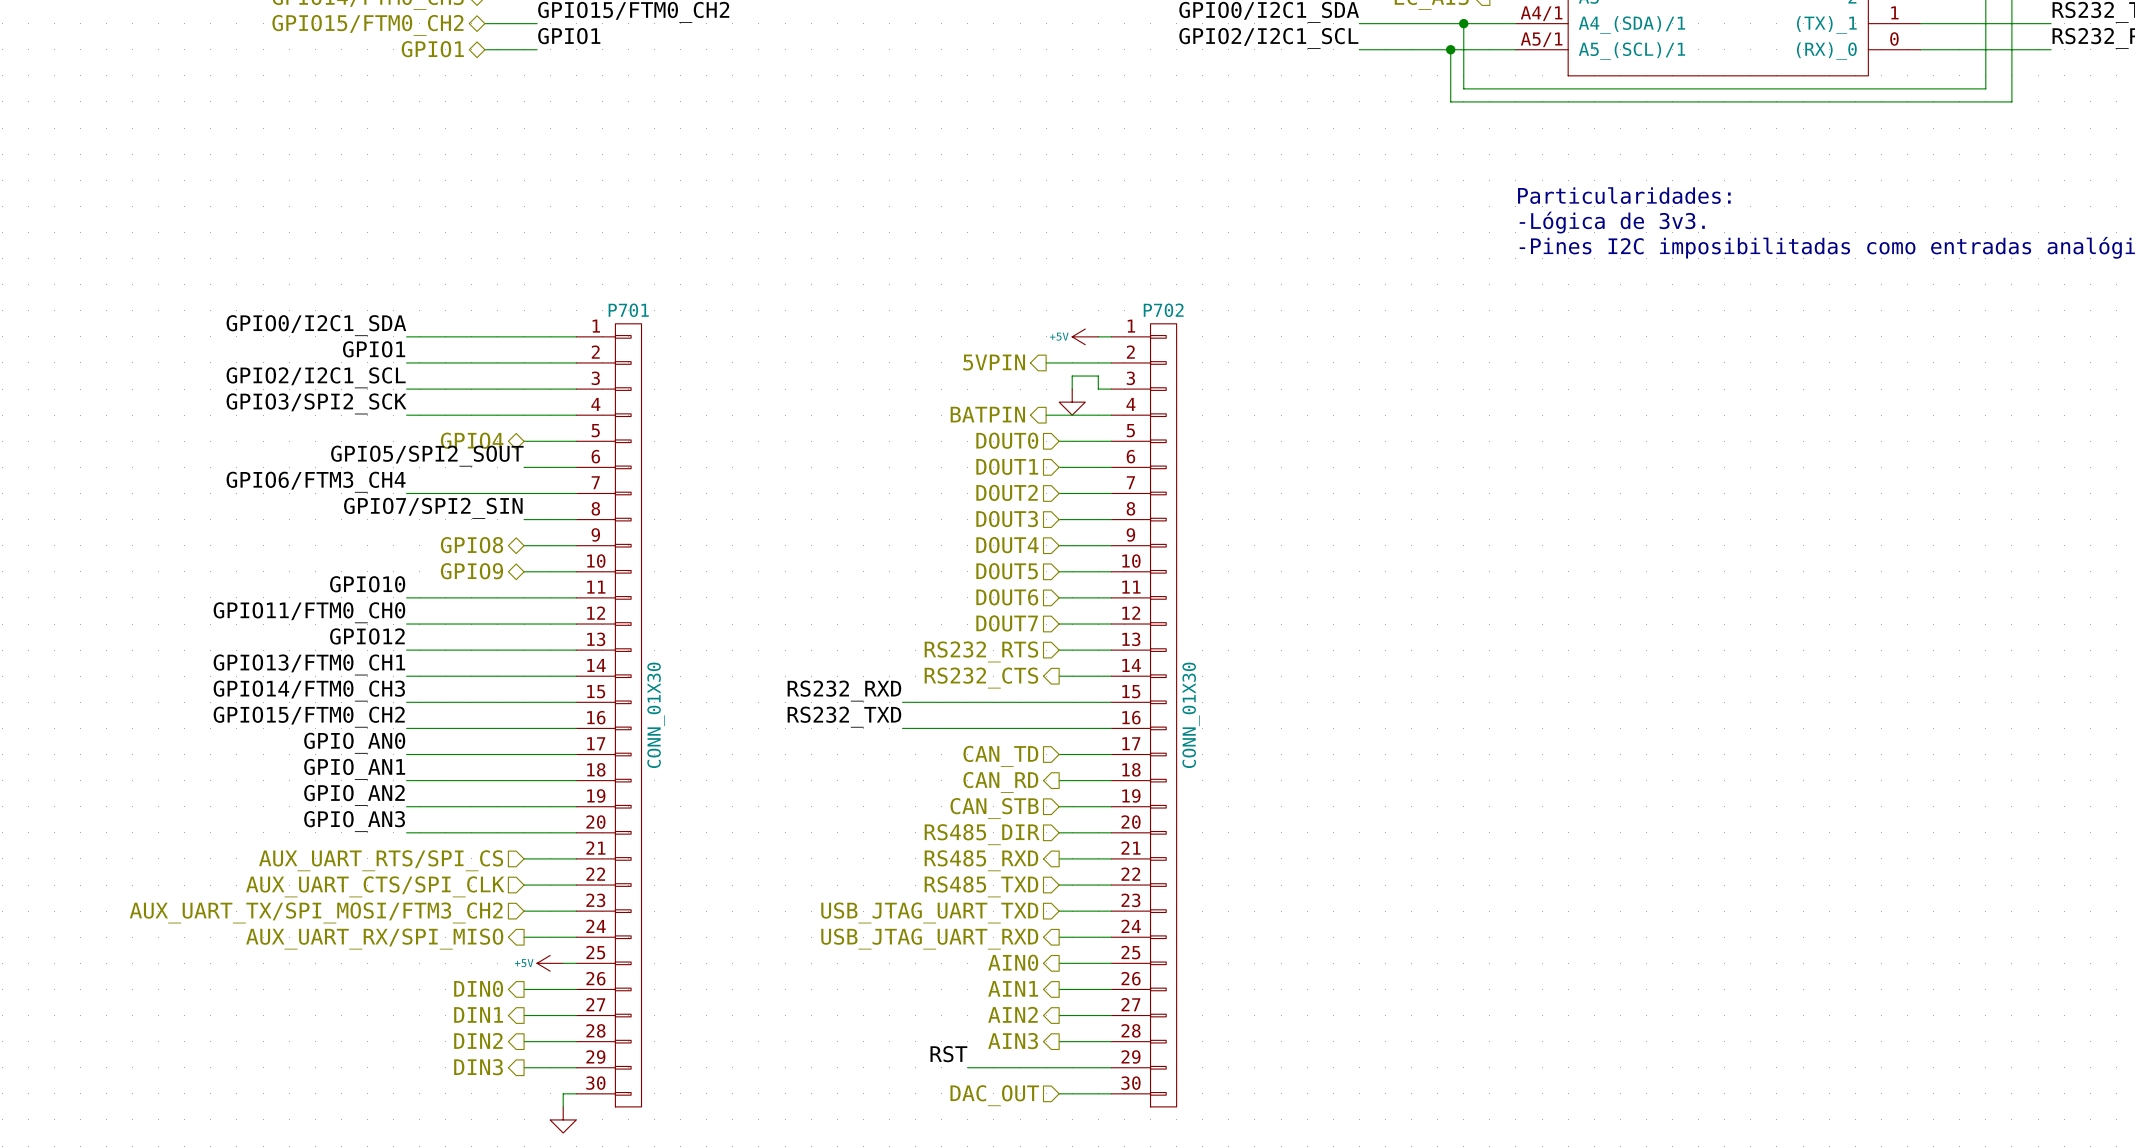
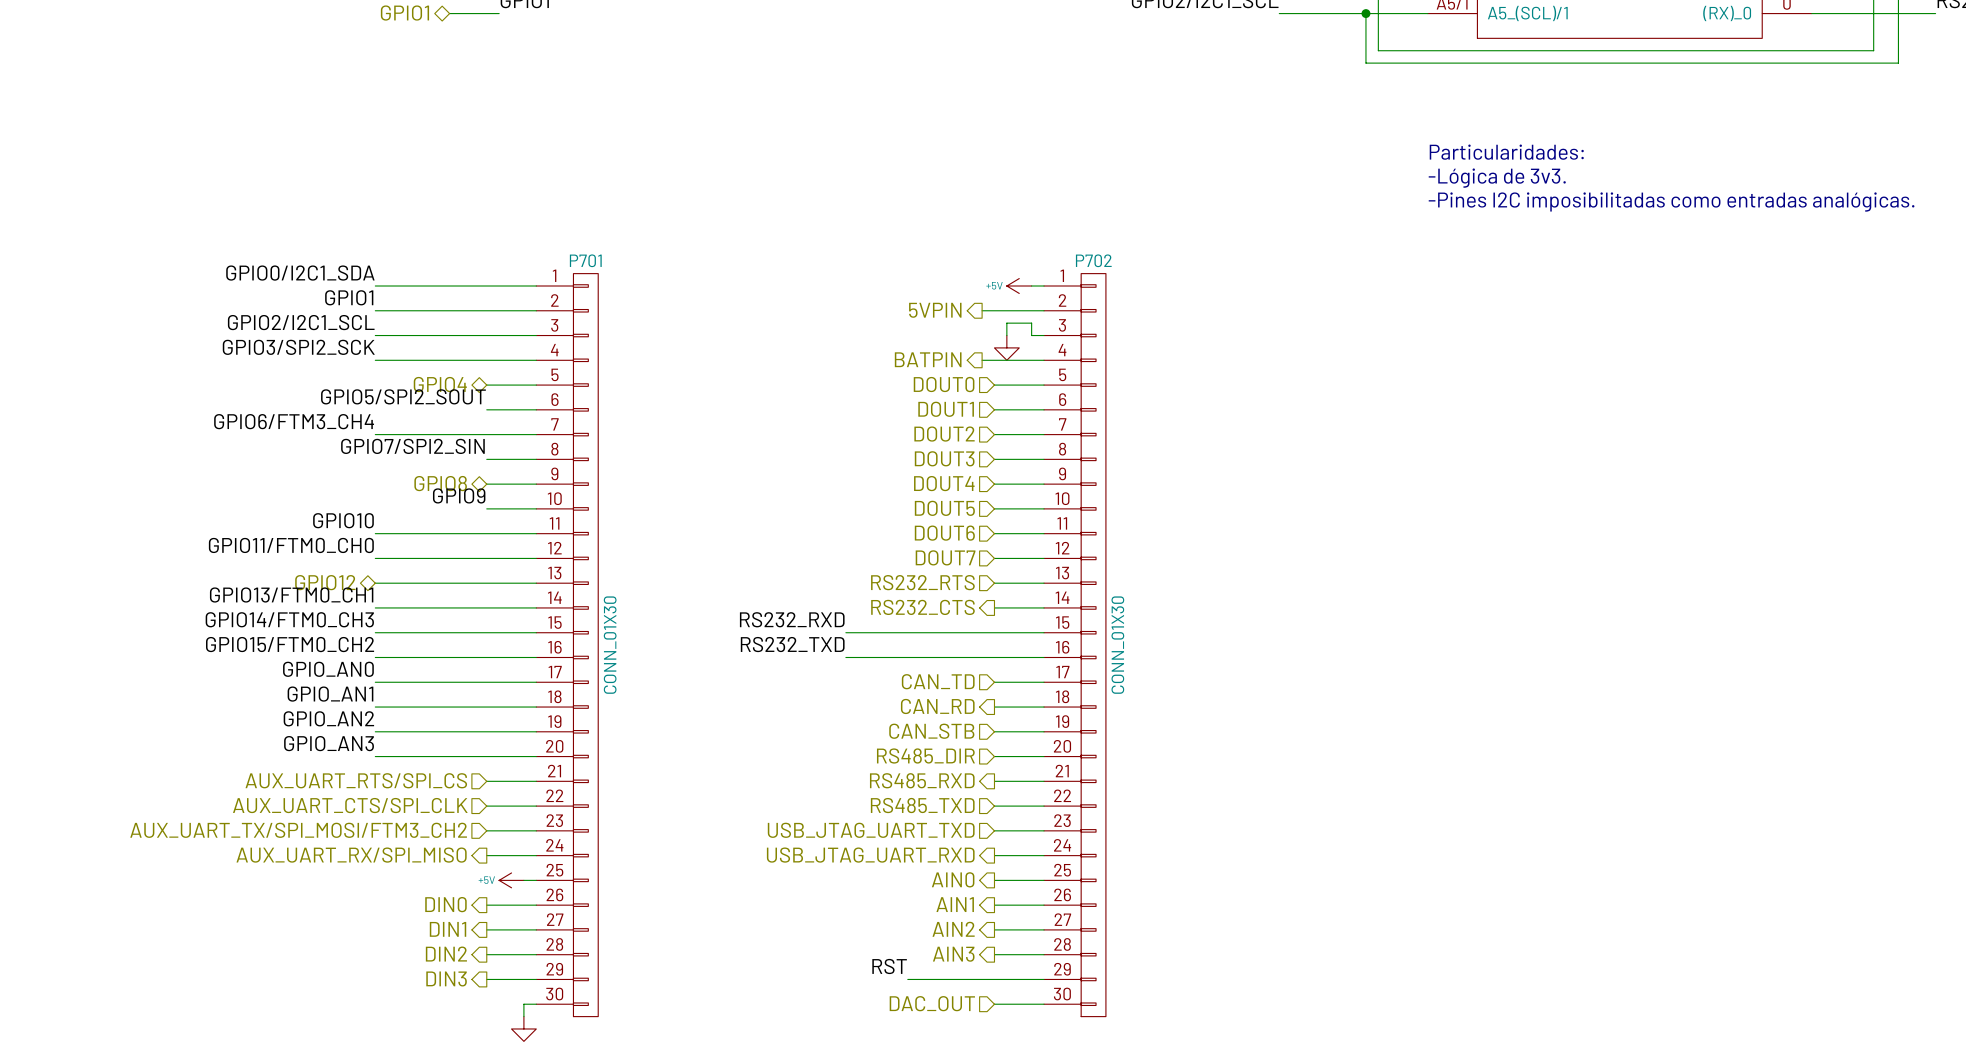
label: none -> GPIO9 (459, 495)
hierarchical label: GPIO9 (471, 571) -> none
label: GPIO12 (367, 636) -> none
hierarchical label: none -> GPIO12 (325, 582)

